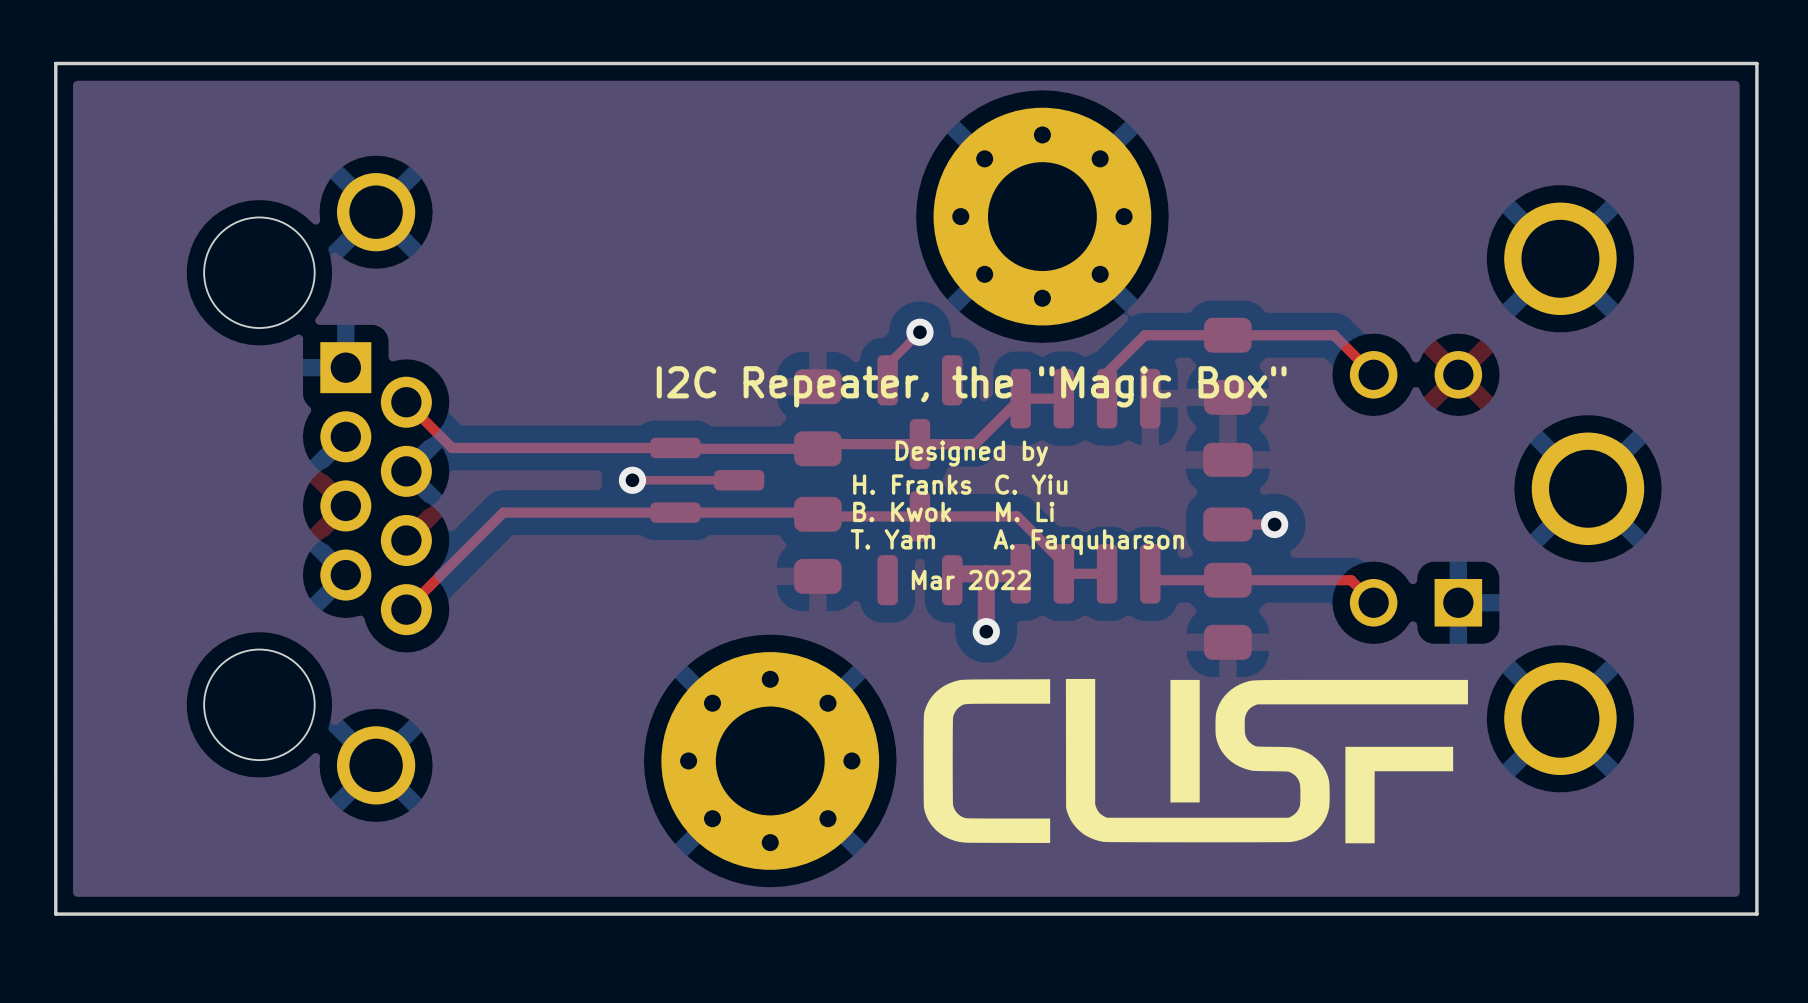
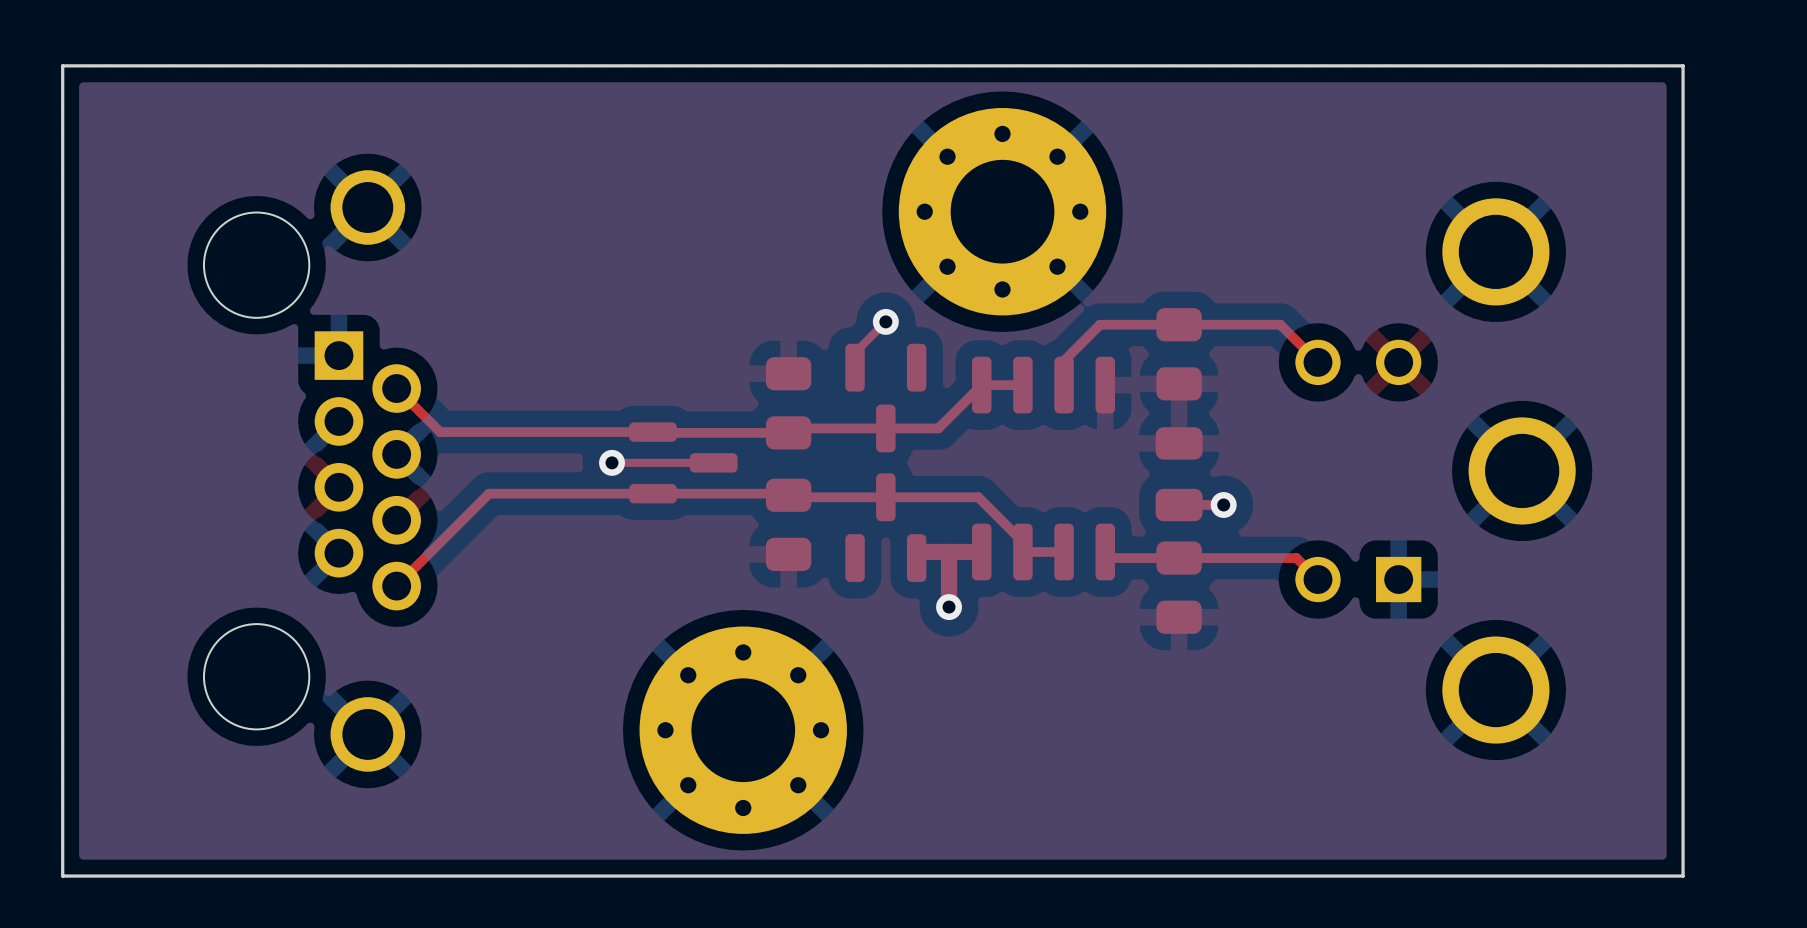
text: I2C Repeater, the "Magic Box" (971, 386) -> none
text: Designed by (971, 453) -> none
text: H. Franks (912, 484) -> none
text: C. Yiu (1031, 484) -> none
text: B. Kwok (902, 511) -> none
text: M. Li (1025, 511) -> none
text: T. Yam (892, 539) -> none
text: A. Farquharson (1088, 542) -> none
text: Mar 2022 (971, 580) -> none
drawing: [923, 678, 1468, 844] -> none

